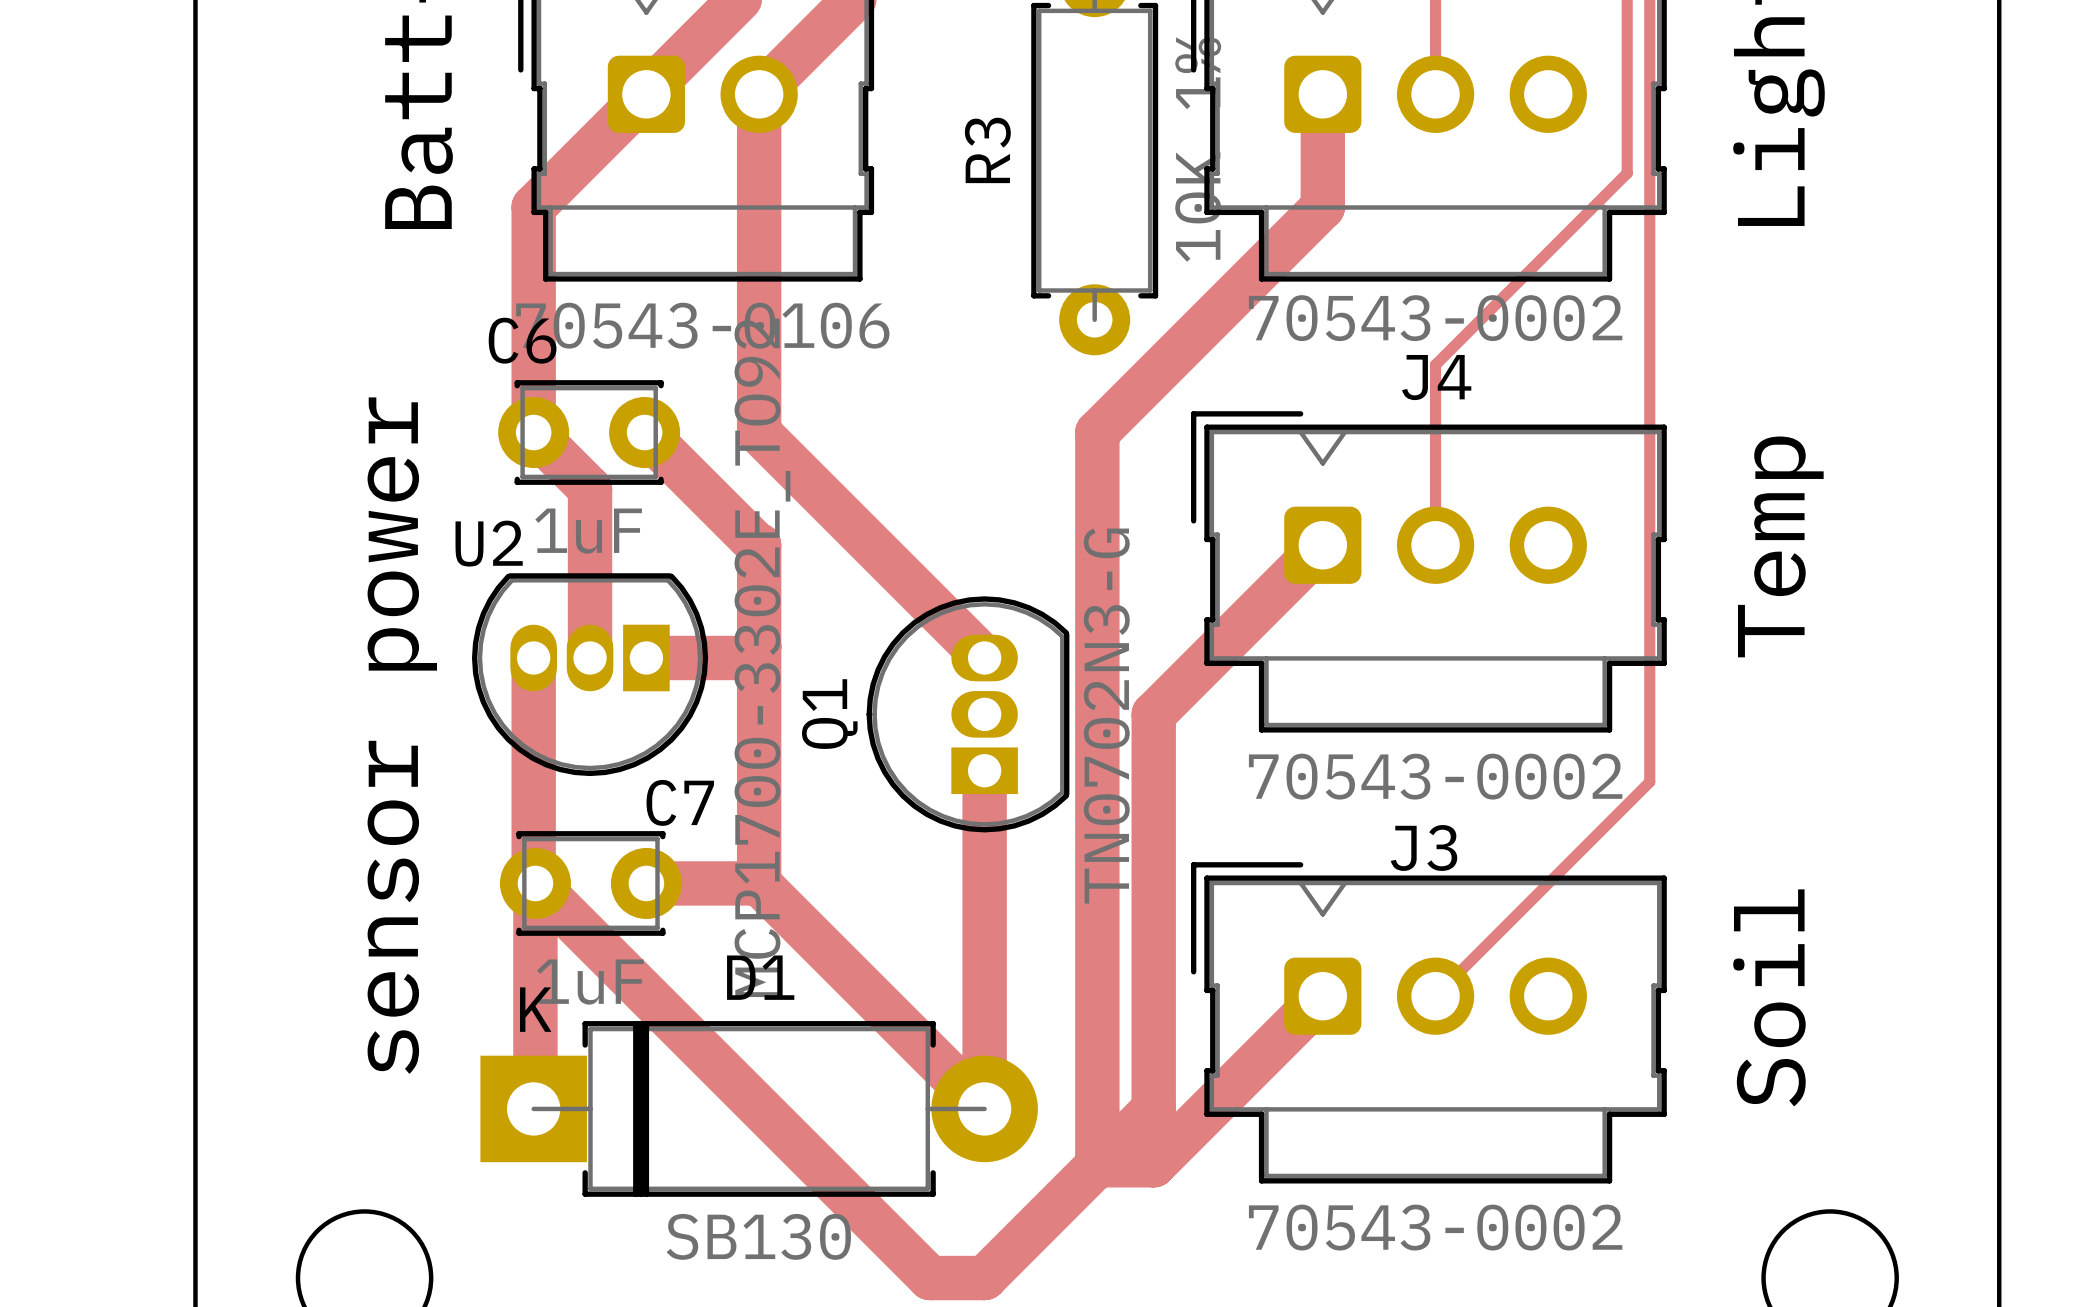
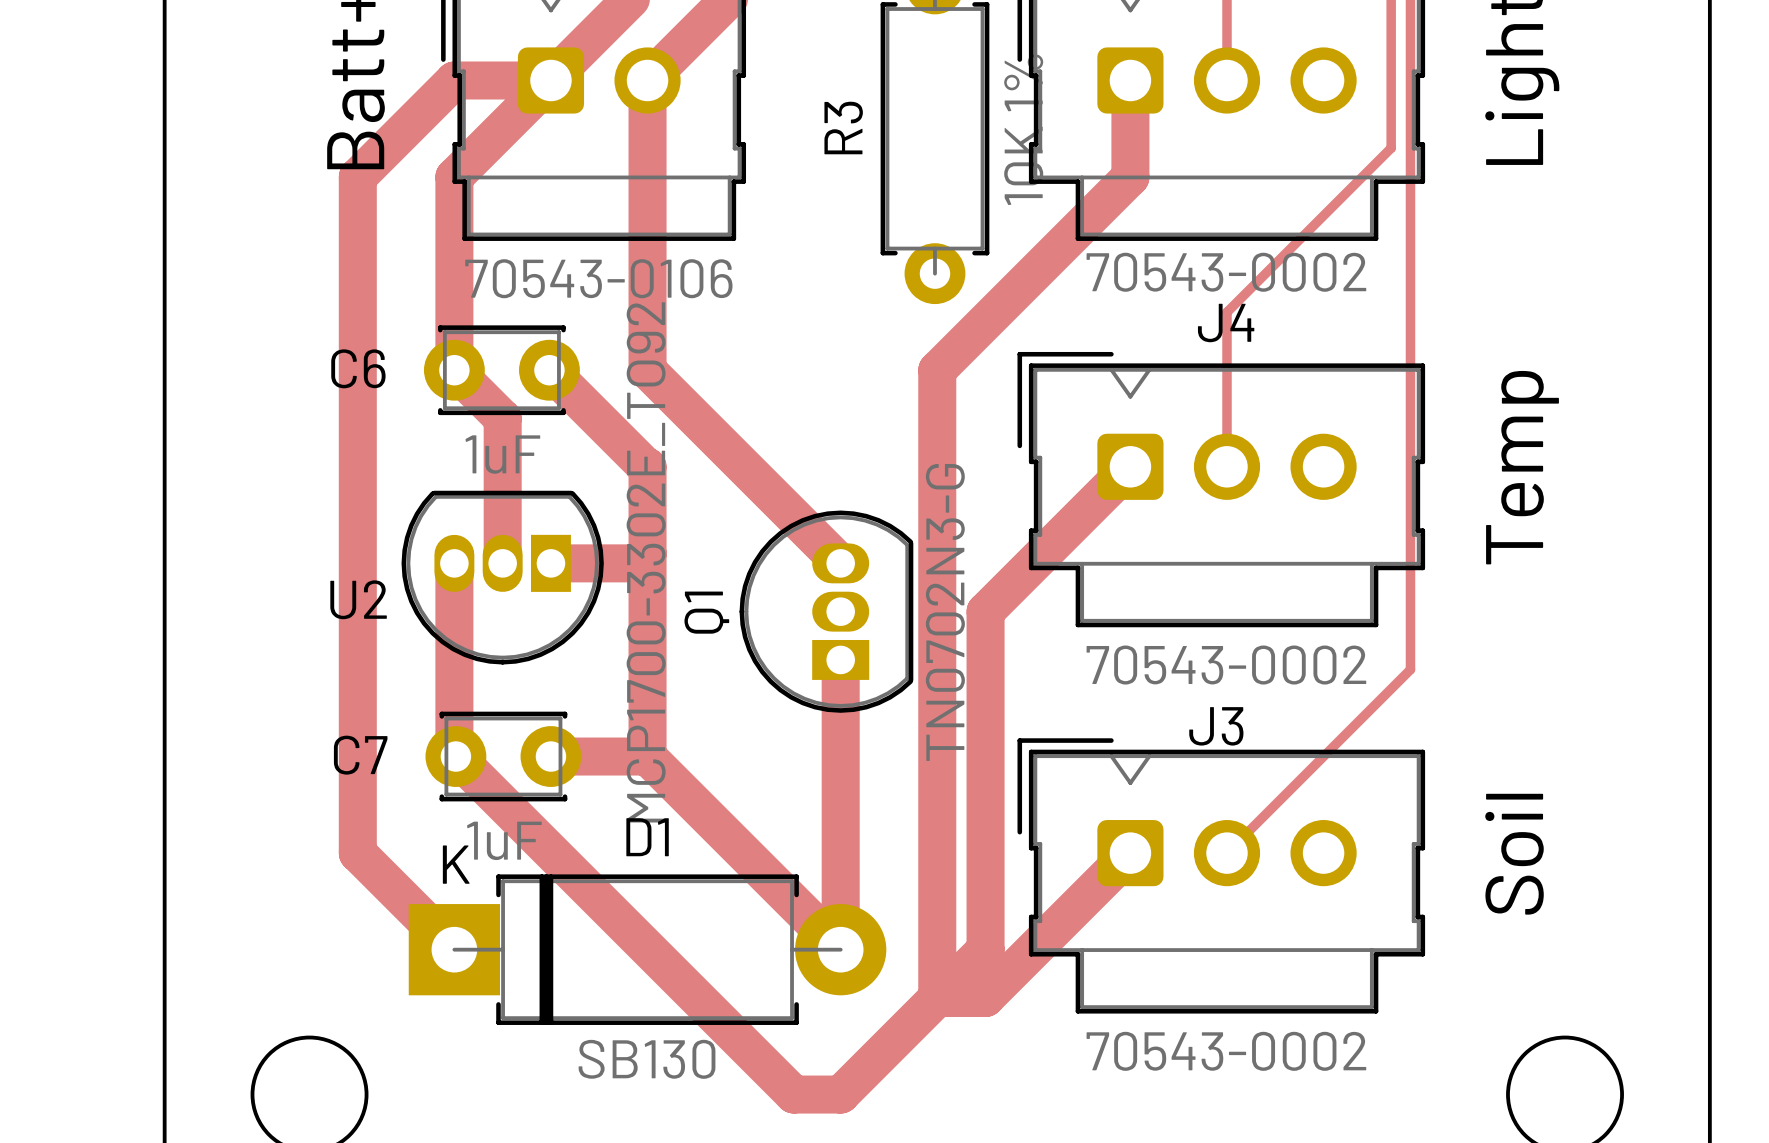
C6 name position: C6 (522, 340) -> C6 (358, 368)
U2 name position: U2 (489, 543) -> U2 (358, 599)
text: sensor power (402, 735) -> none
C7 name position: C7 (680, 802) -> C7 (360, 755)
track: (535, 883) (535, 1107) (533, 1108) -> (550, 80) (454, 80) (357, 177) (357, 853) (454, 949)

